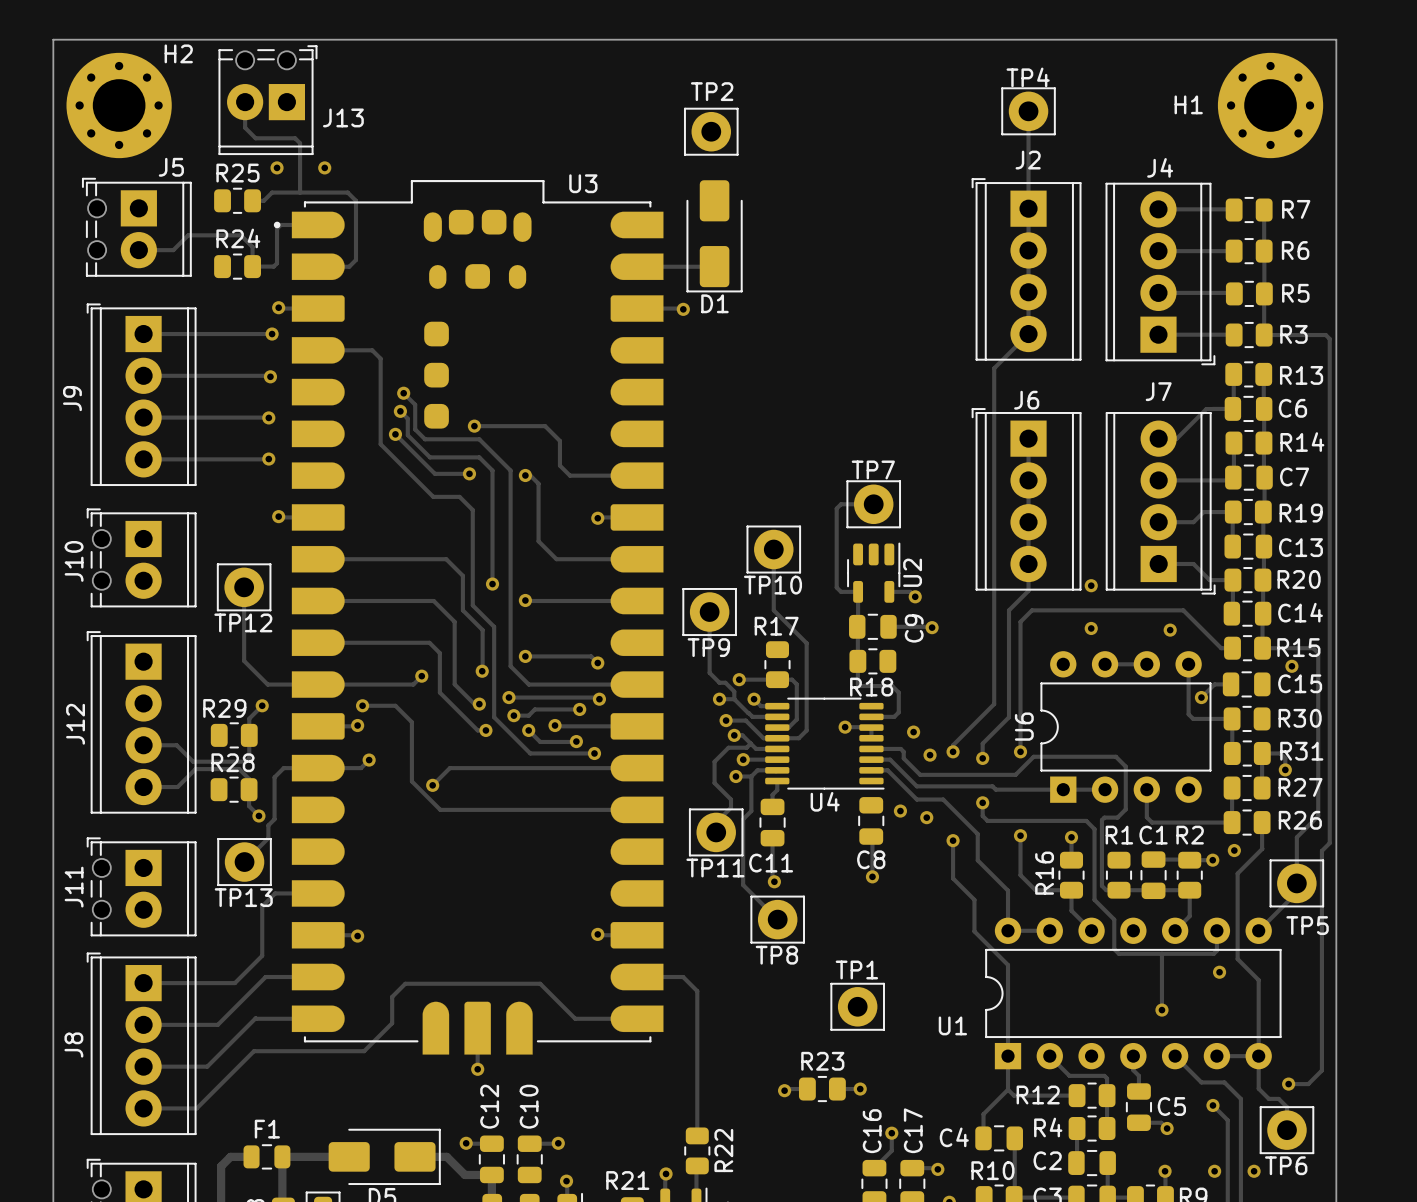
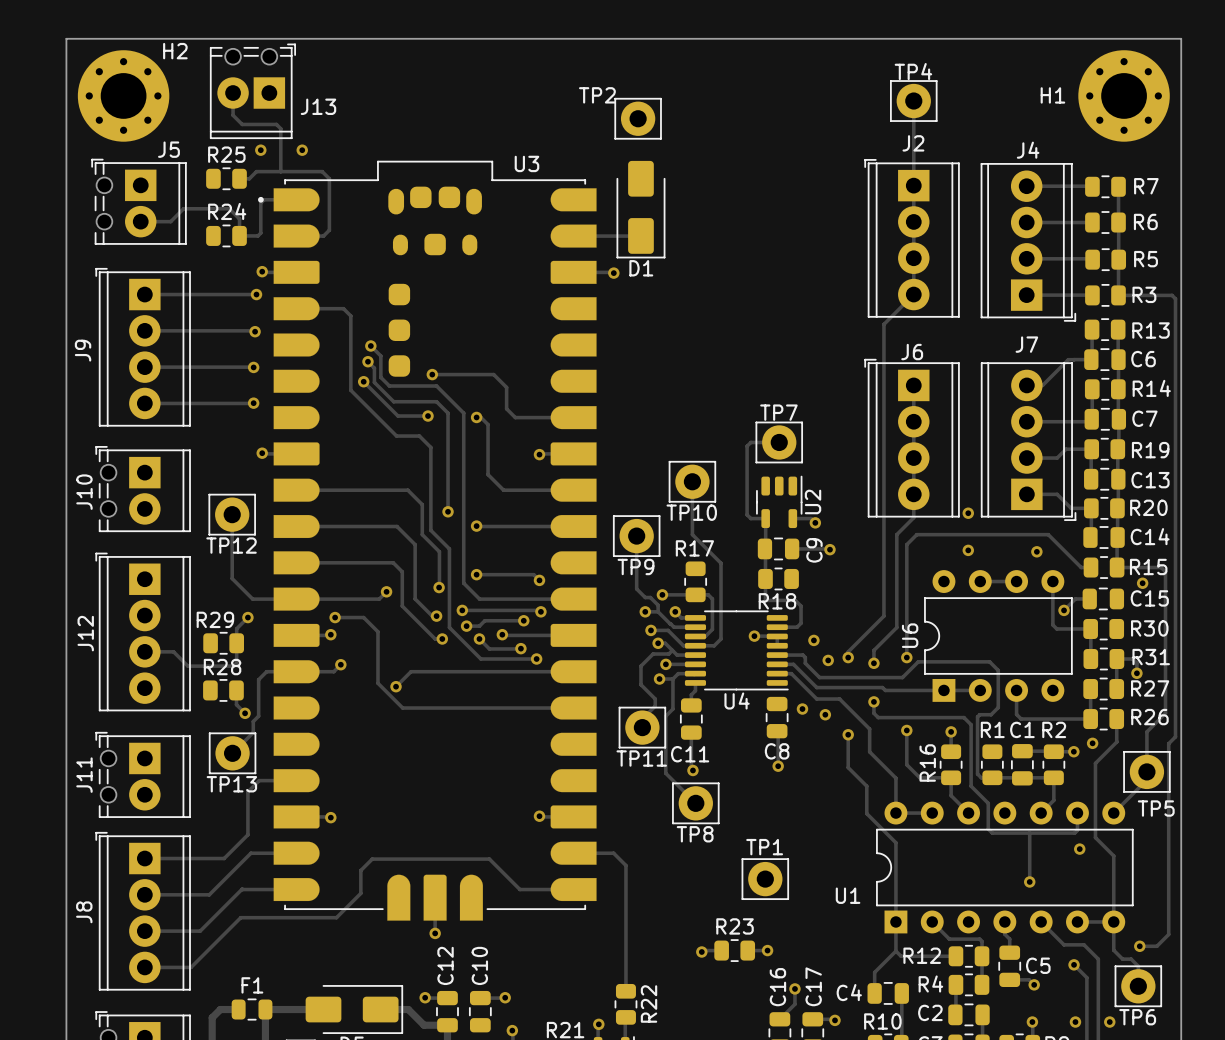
TP2 name position: TP2 (712, 91) -> TP2 (597, 95)
track: (143, 787) (177, 787) (195, 769) (239, 769) (249, 778) (249, 789) -> none

